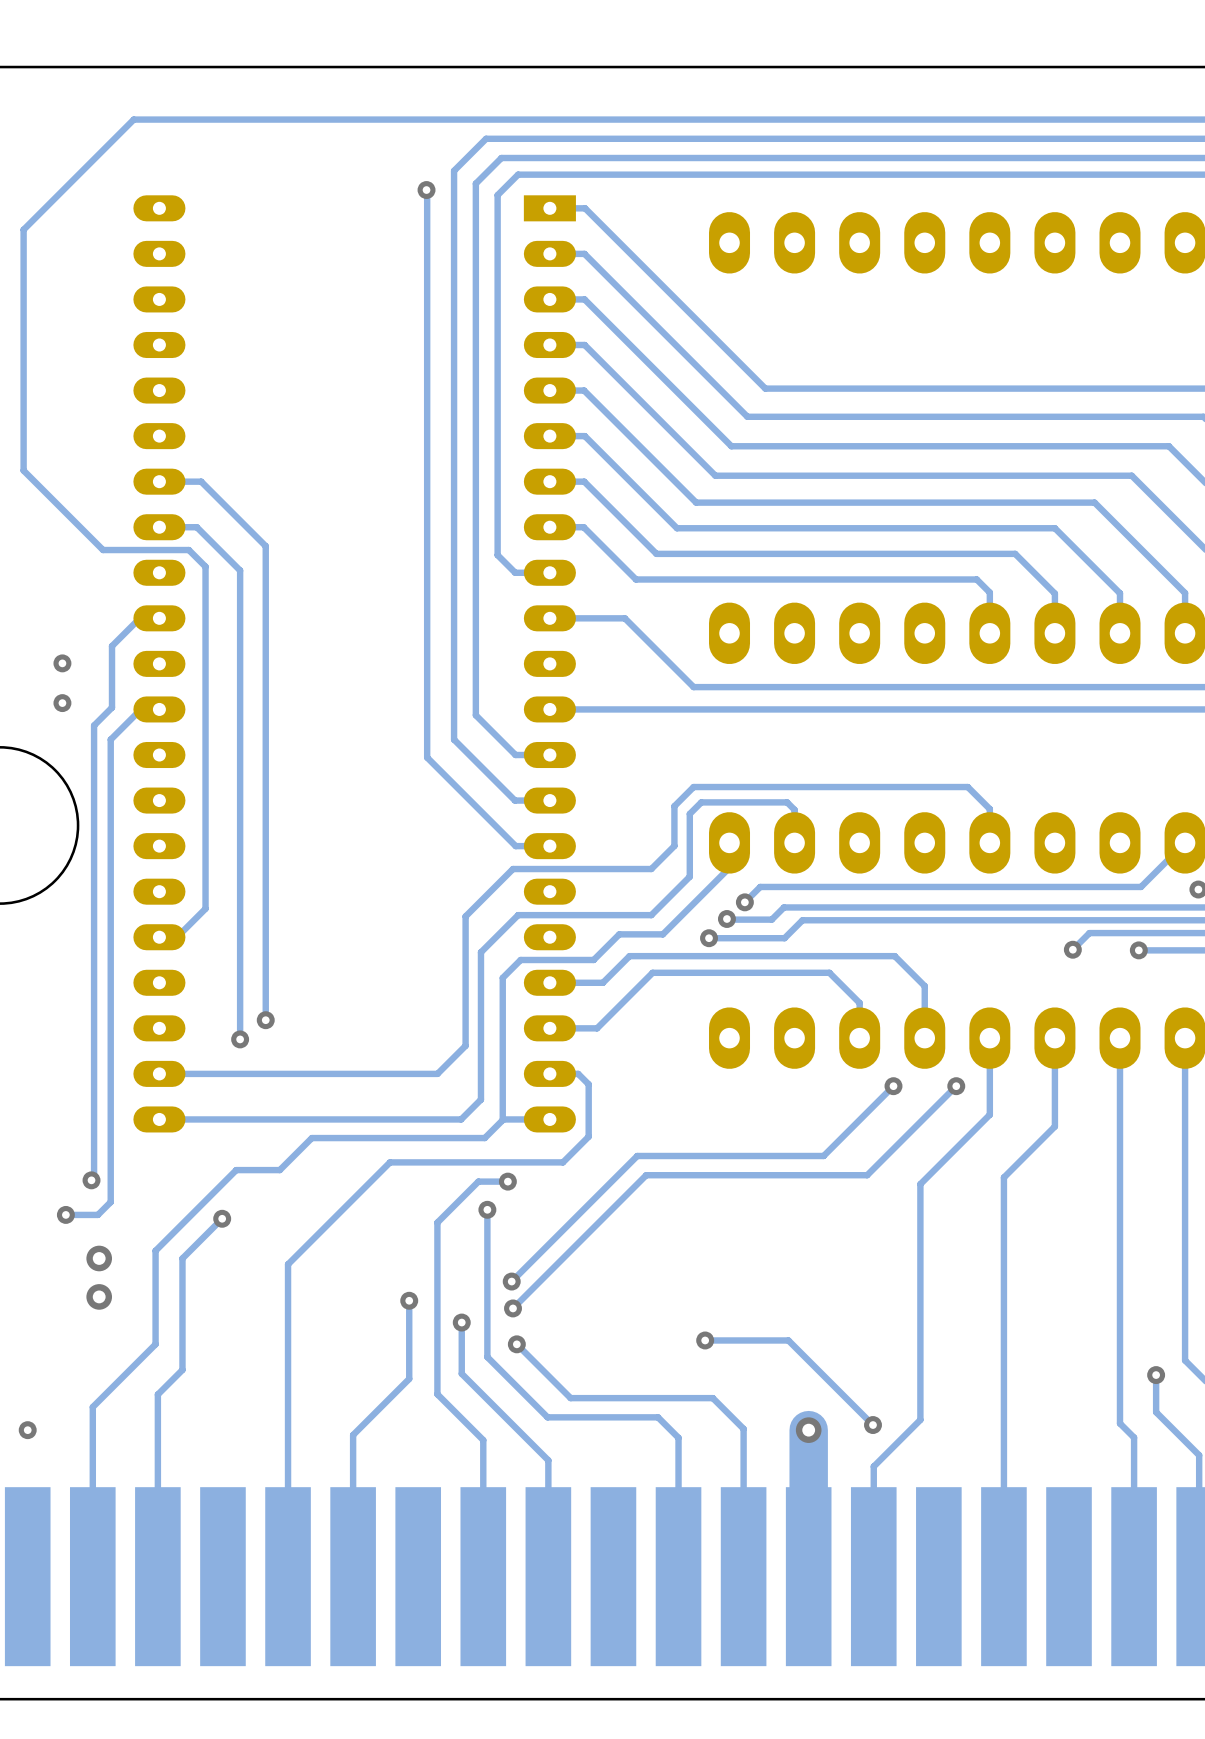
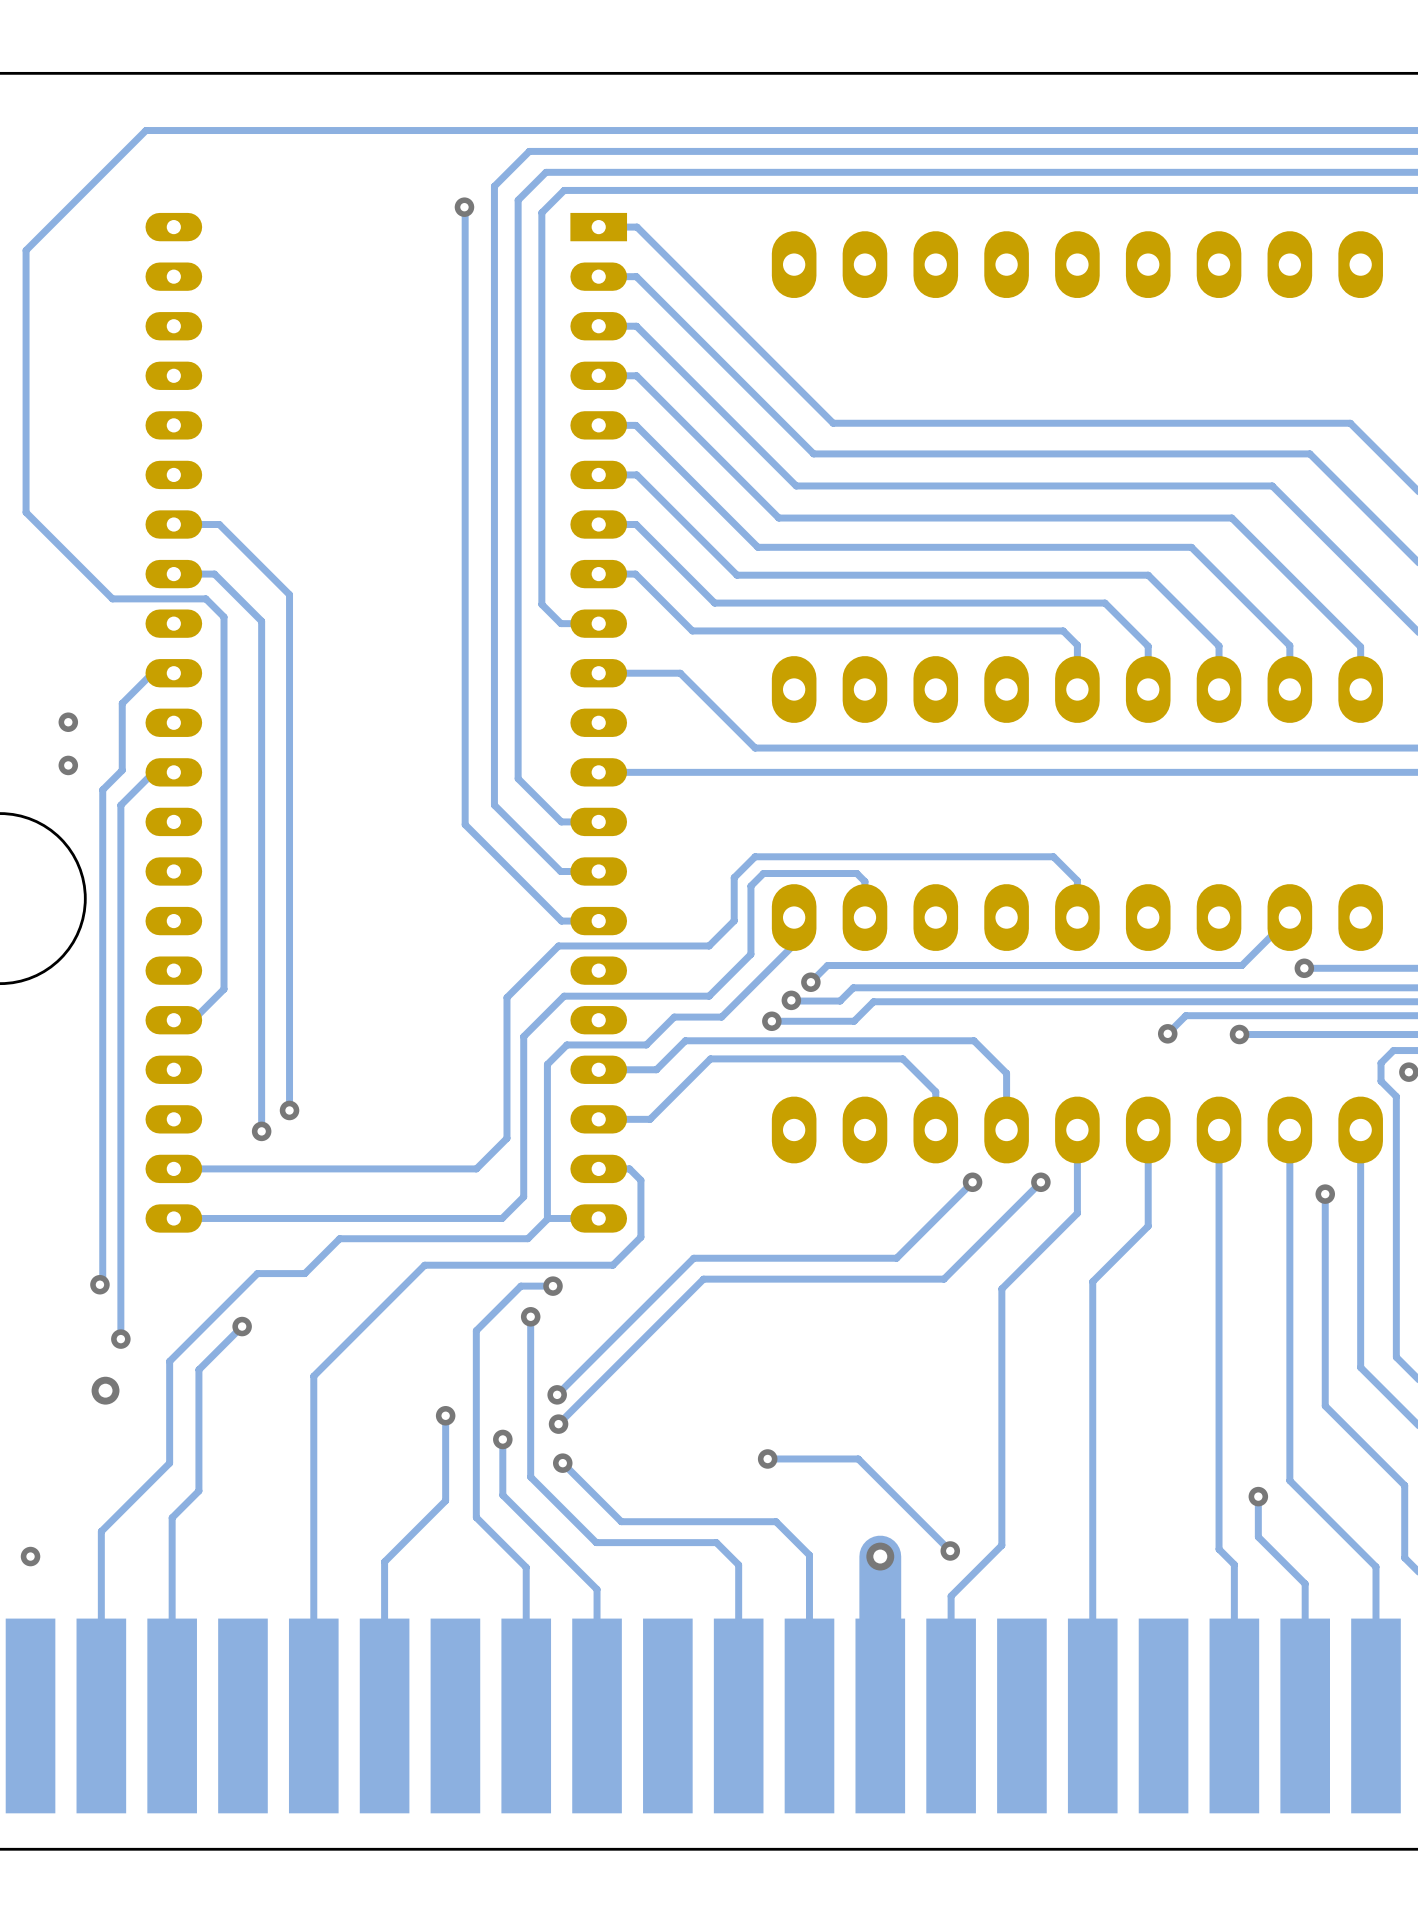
track: (110, 1202) (97, 1214) (65, 1214) -> (120, 1308) (120, 1339)
via position: (65, 1214) -> (120, 1339)
via: (99, 1258) -> none
via: none -> (105, 1390)
via: (99, 1296) -> none

